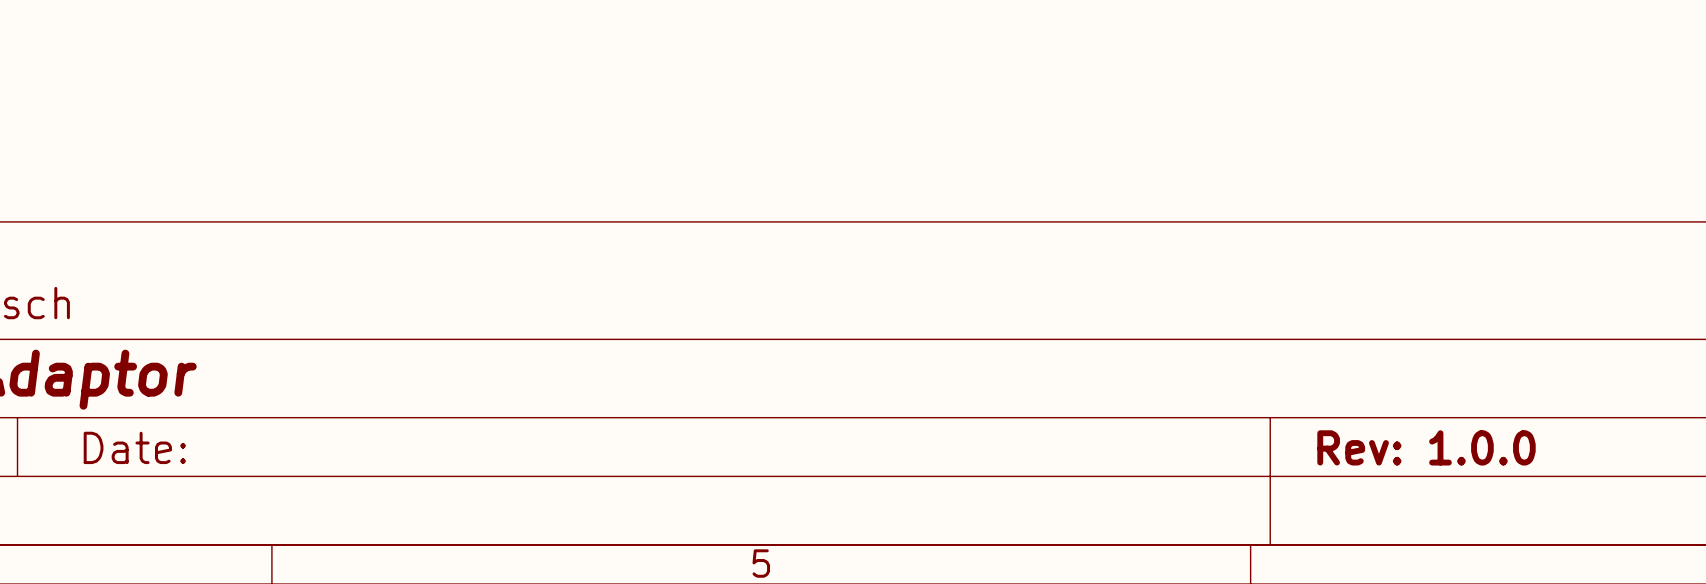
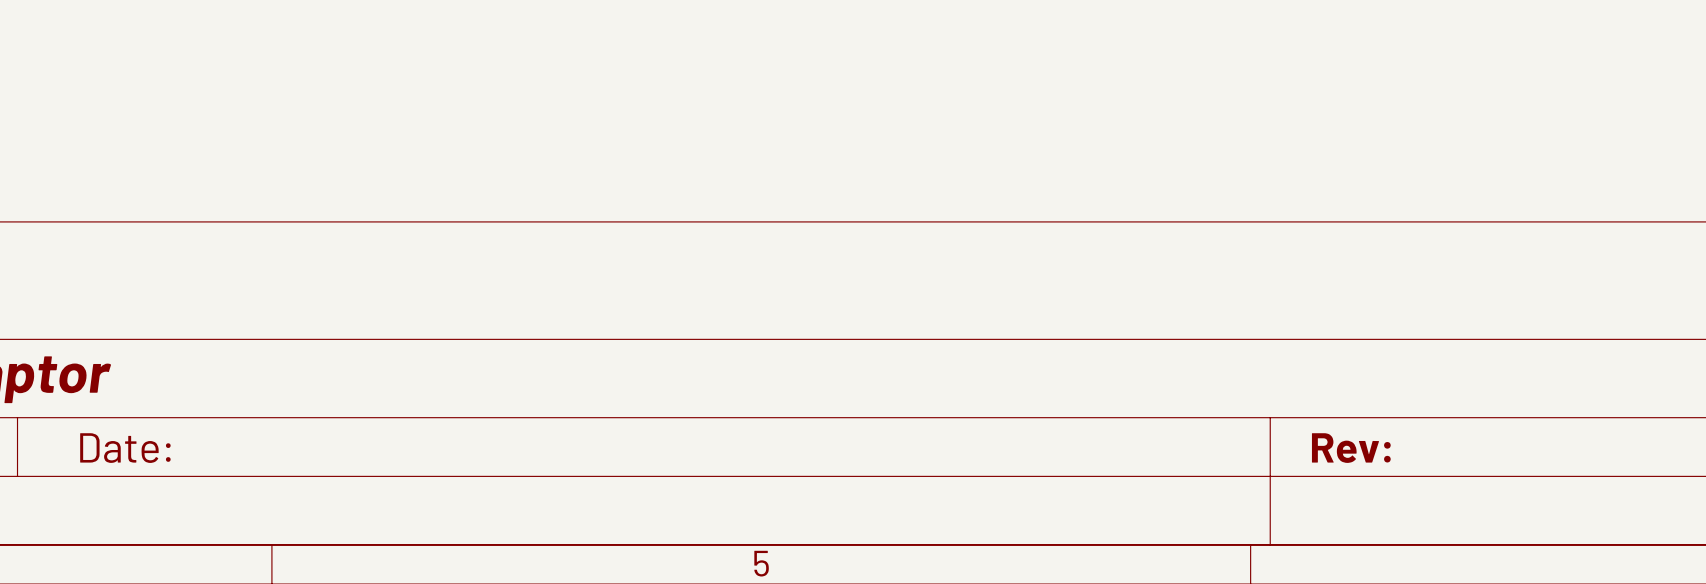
title block: Rev: 1.0.0 (1426, 447) -> Rev: (1351, 448)

